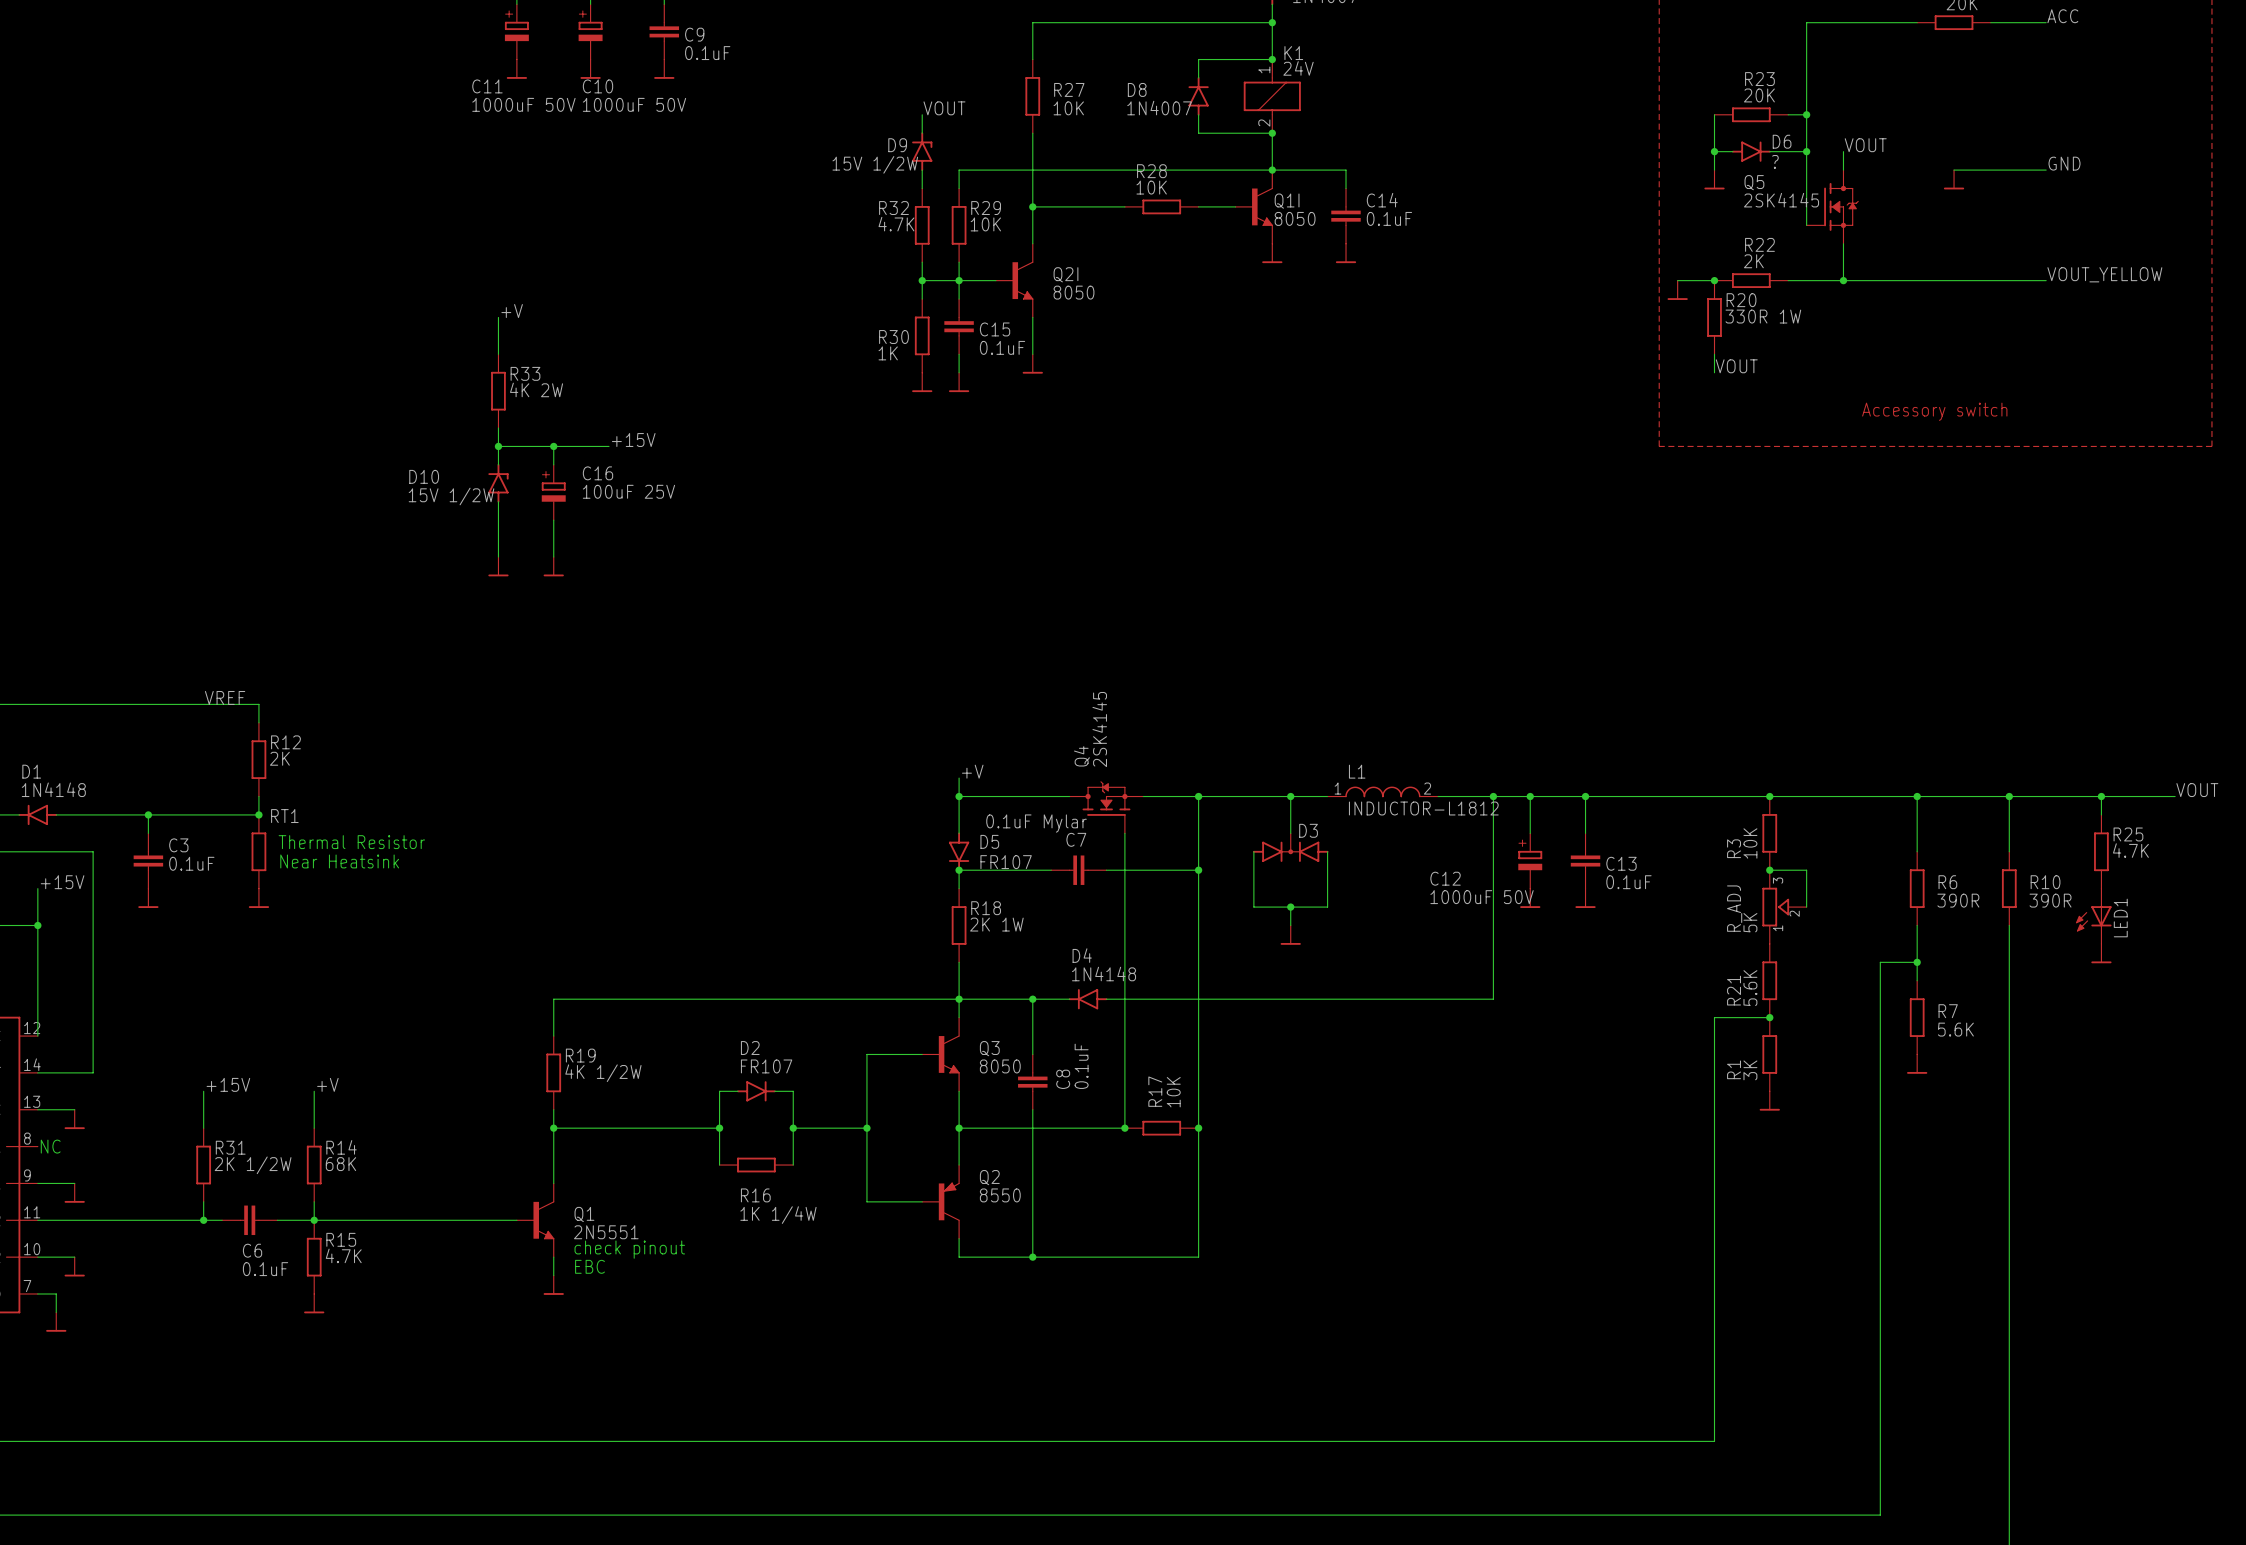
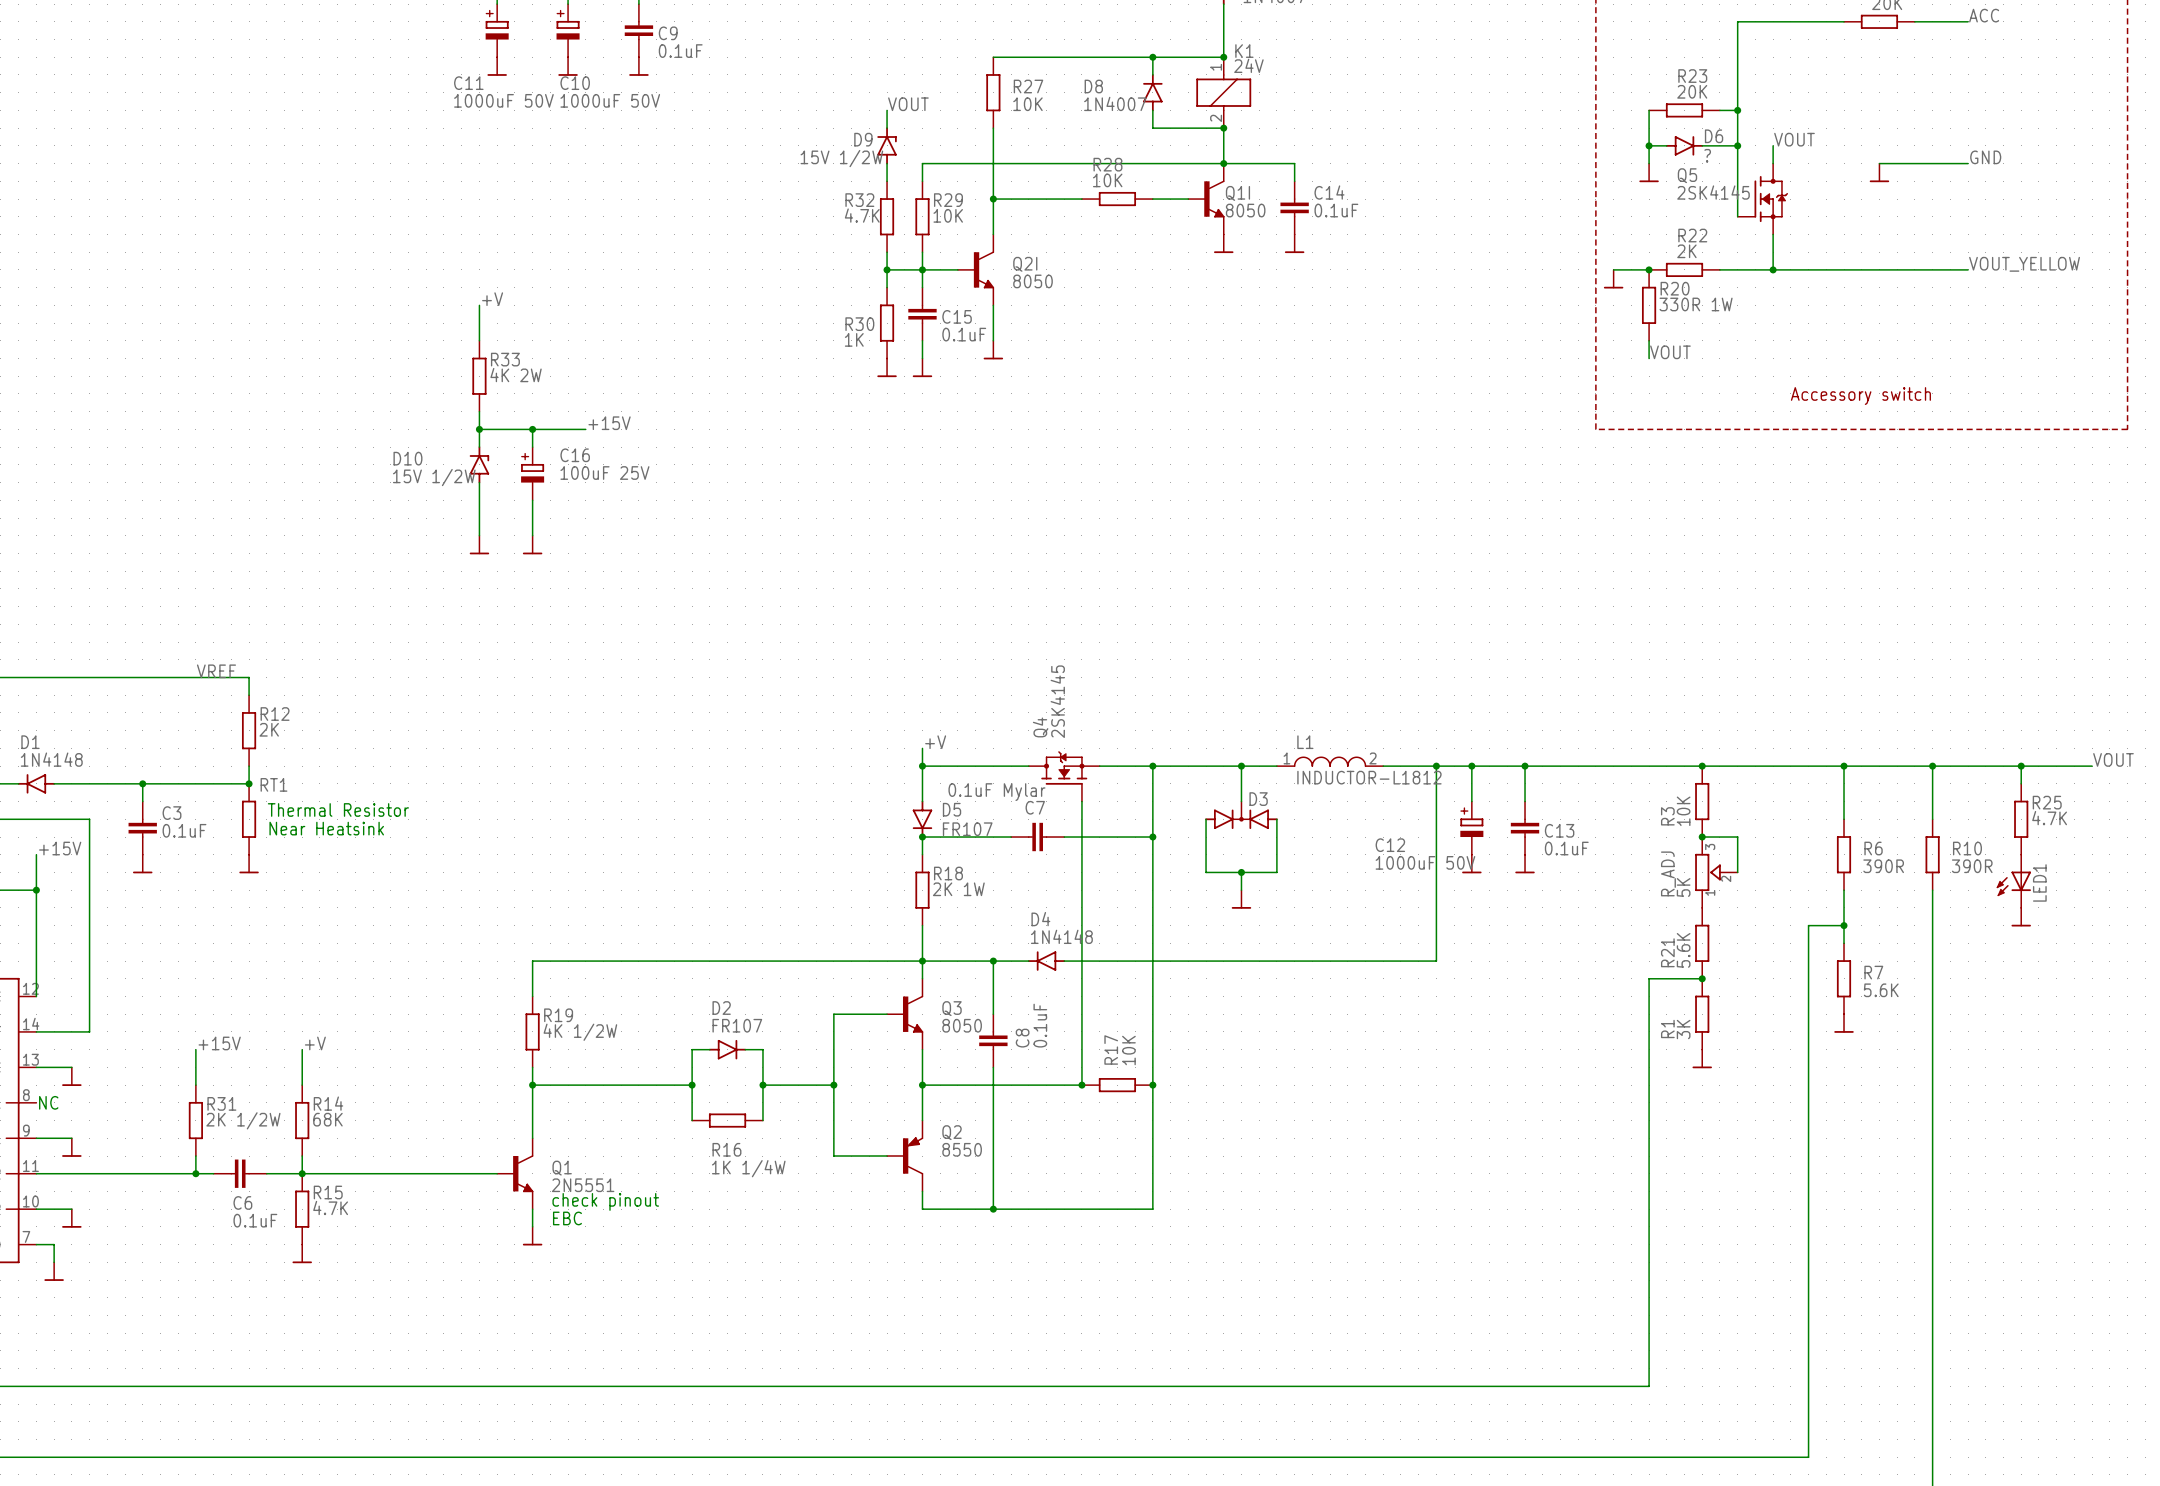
wire: (1272, 22) (1032, 22) (1032, 59) -> (1152, 57) (993, 57)
junction: (1272, 22) -> none
junction: none -> (1152, 57)

